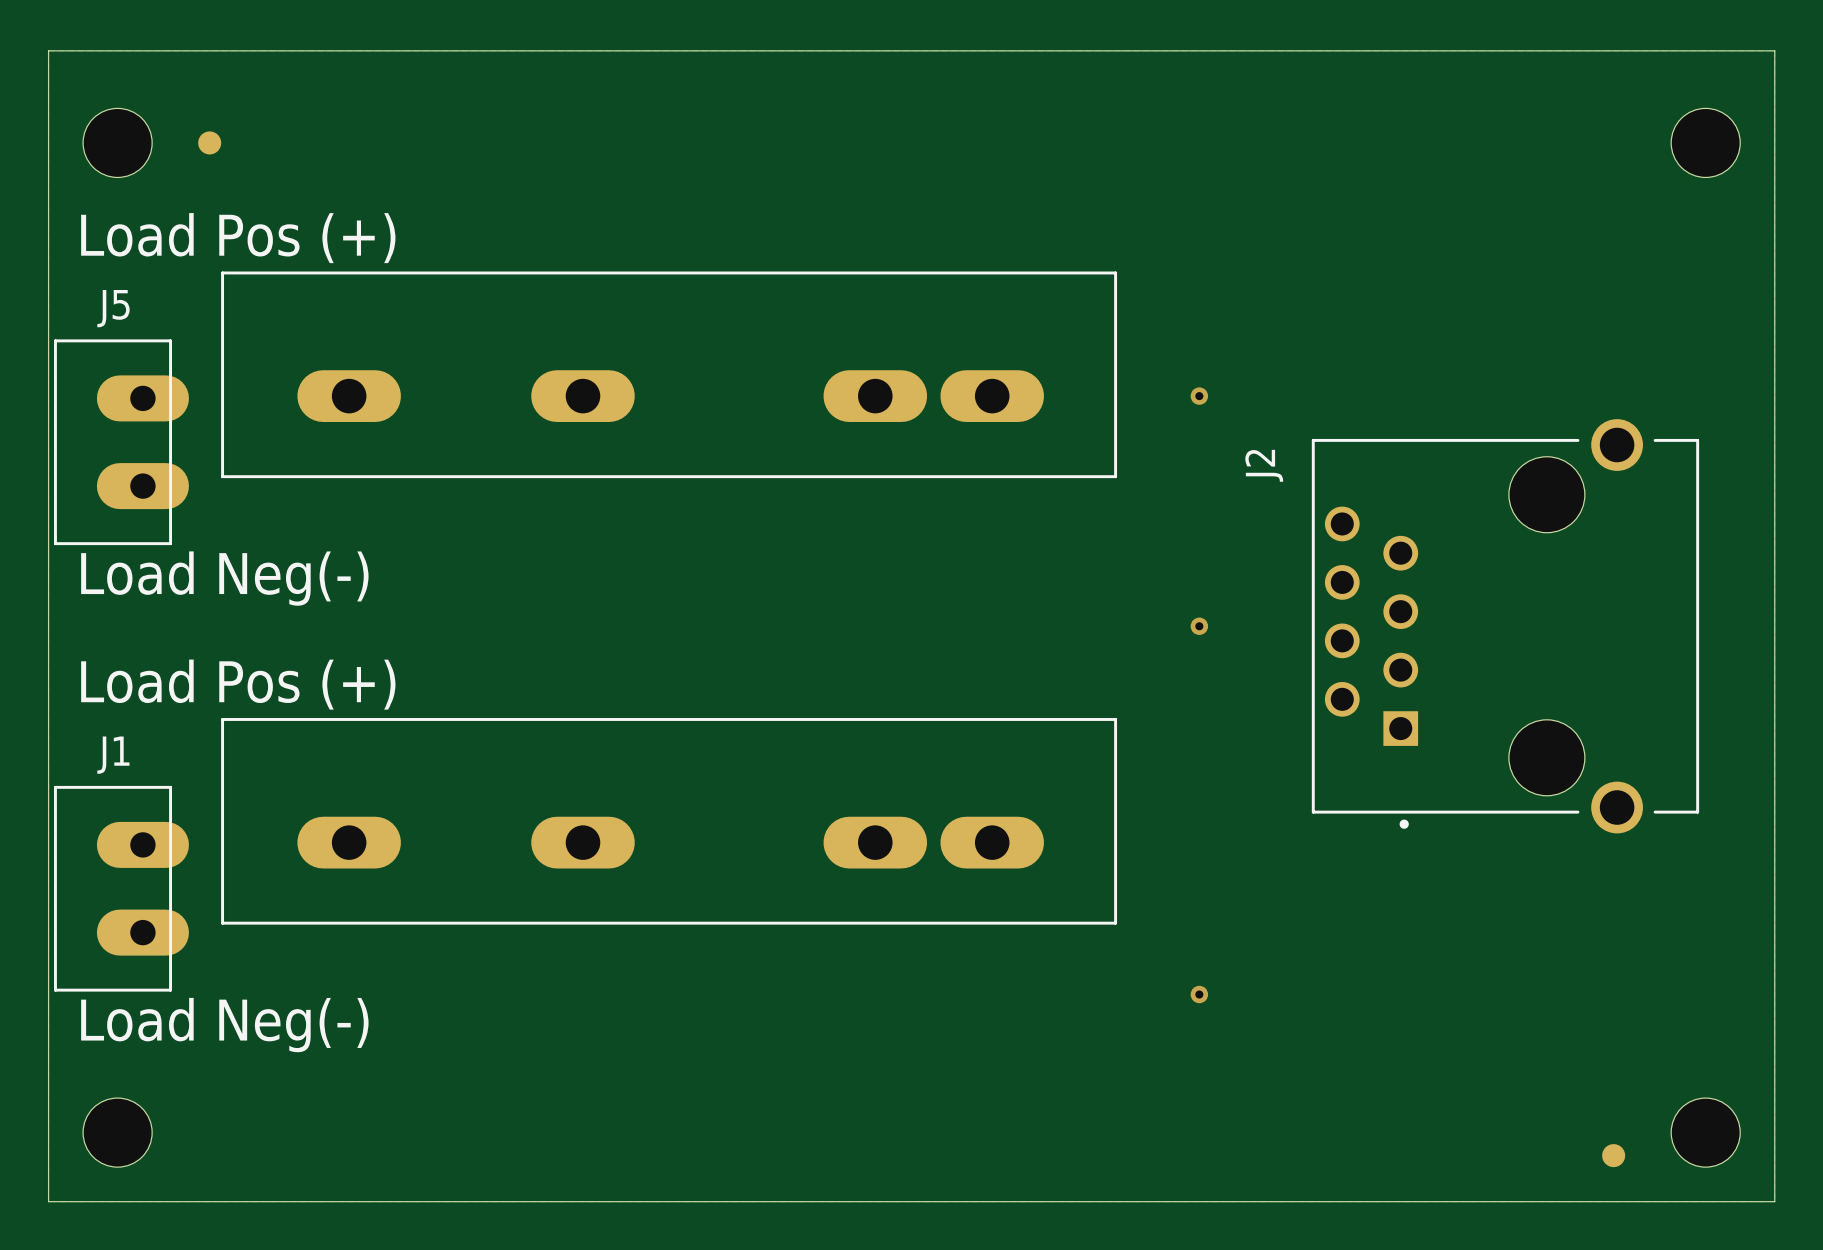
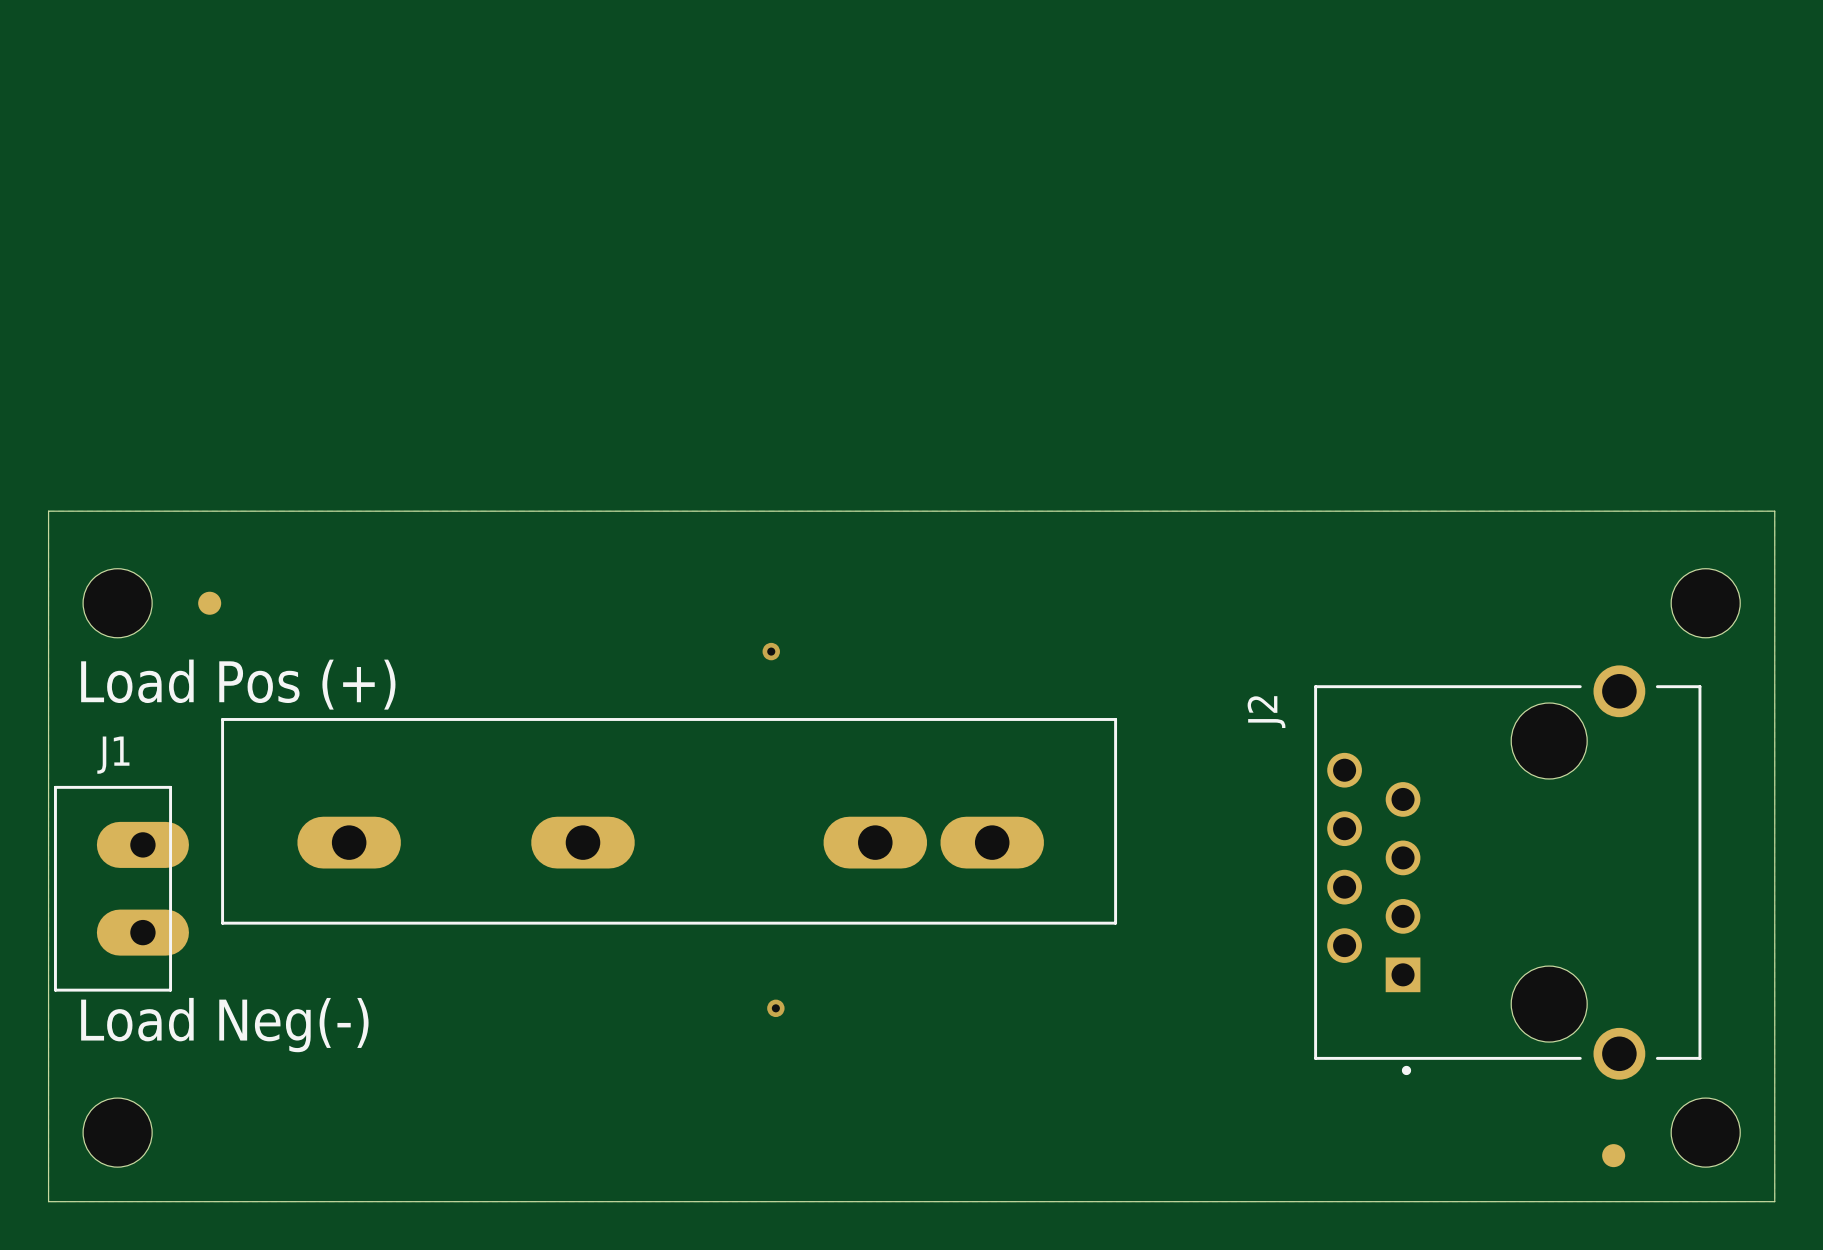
hole position: (117, 142) -> (117, 603)
part position: (209, 142) -> (209, 603)
hole position: (1705, 142) -> (1705, 603)
text: Load Pos (+) (238, 238) -> none
part: (669, 374) -> none
via: (1199, 396) -> none
J5: (121, 442) -> none
board edge: (48, 511) (48, 50) (1774, 50) (1774, 511) -> (48, 511) (1774, 511)
text: Load Neg(-) (224, 578) -> none
via: (1199, 626) -> none
J2 position: (1505, 626) -> (1507, 872)
via: none -> (771, 651)
via: (1199, 994) -> none
via: none -> (775, 1008)

